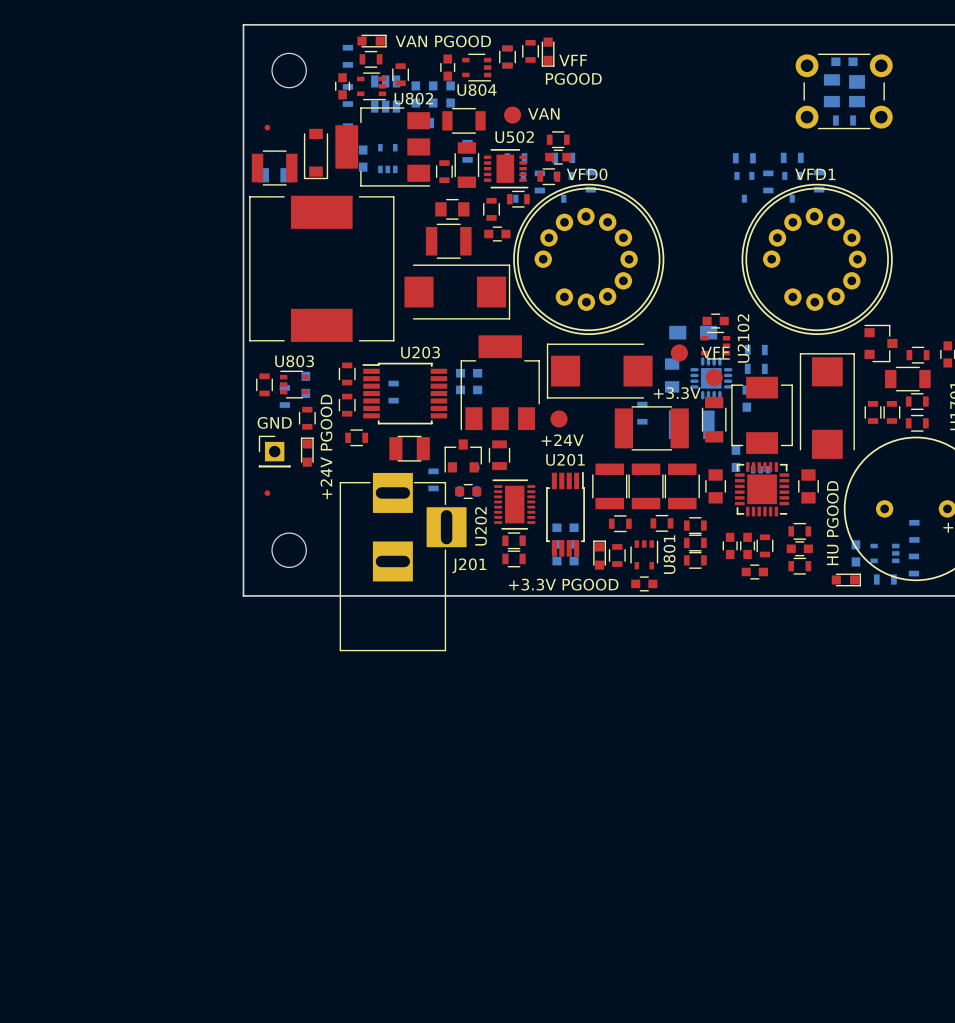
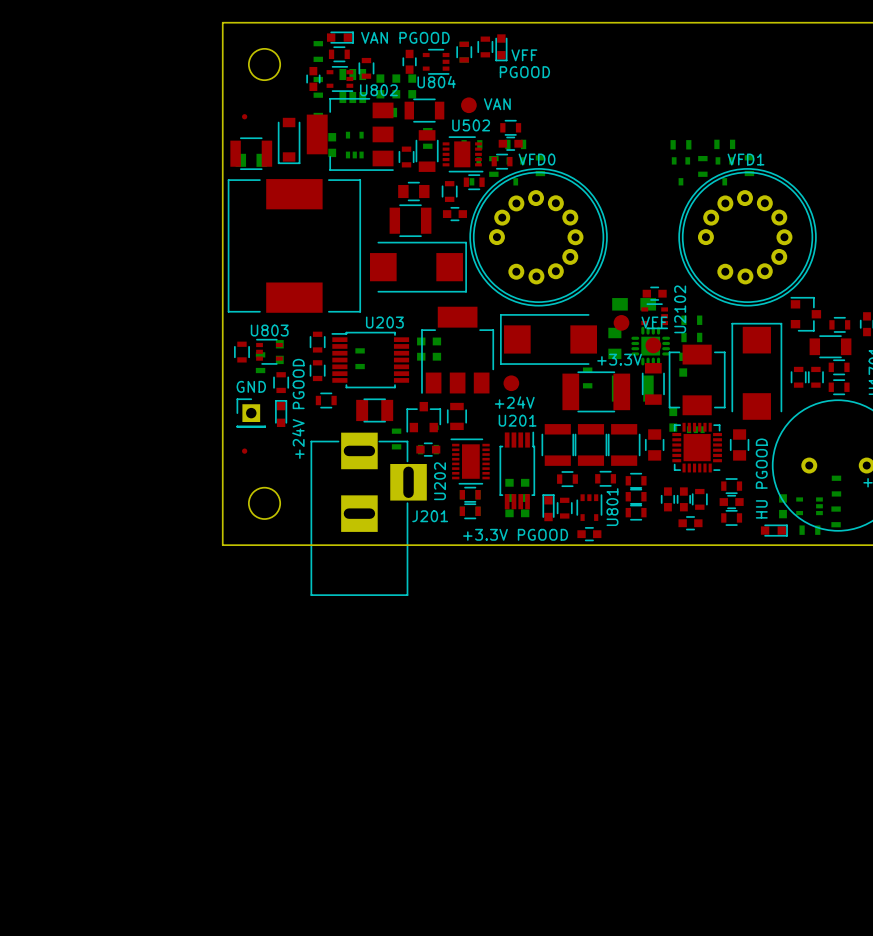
part: (844, 61) -> none
part: (844, 90) -> none
part: (844, 91) -> none
part: (844, 120) -> none

